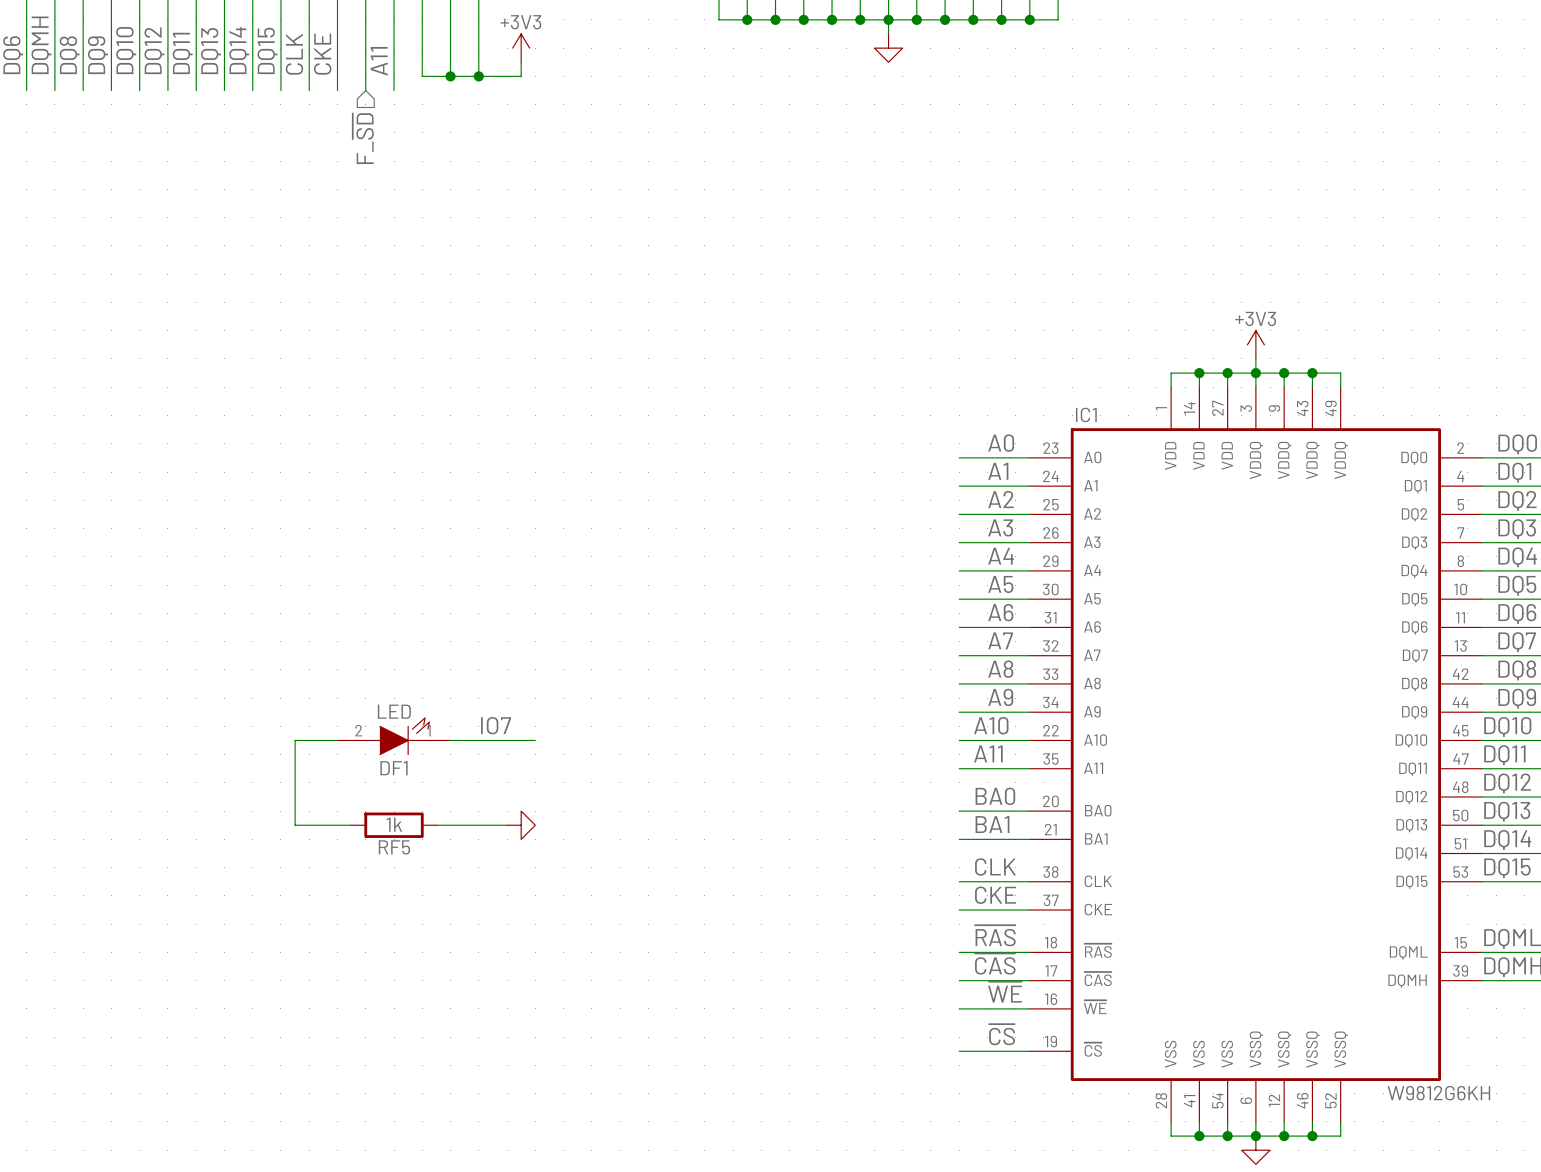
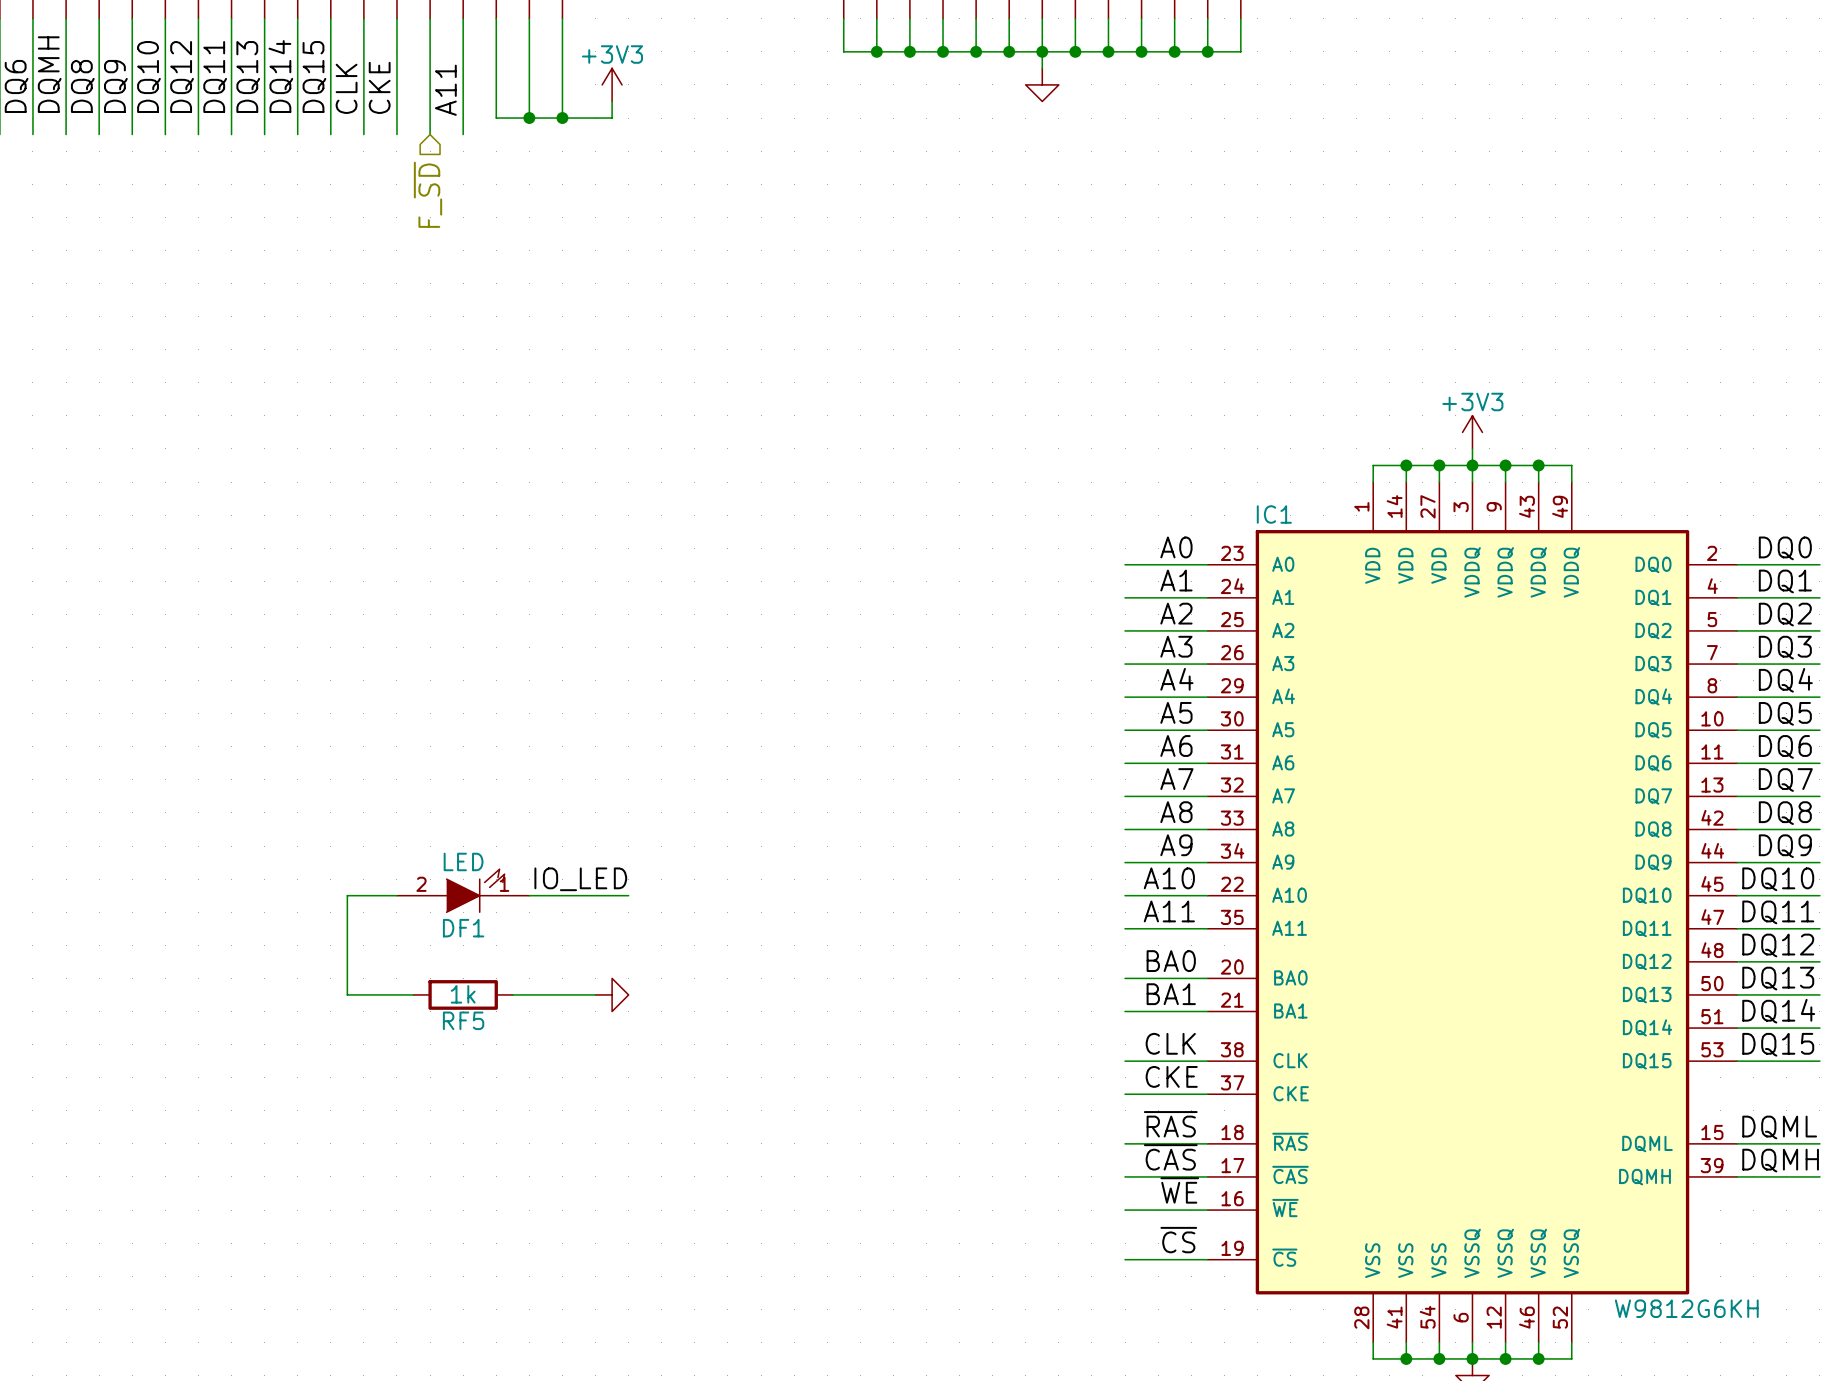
label: none -> IO_LED (580, 879)
label: IO7 (496, 725) -> none

